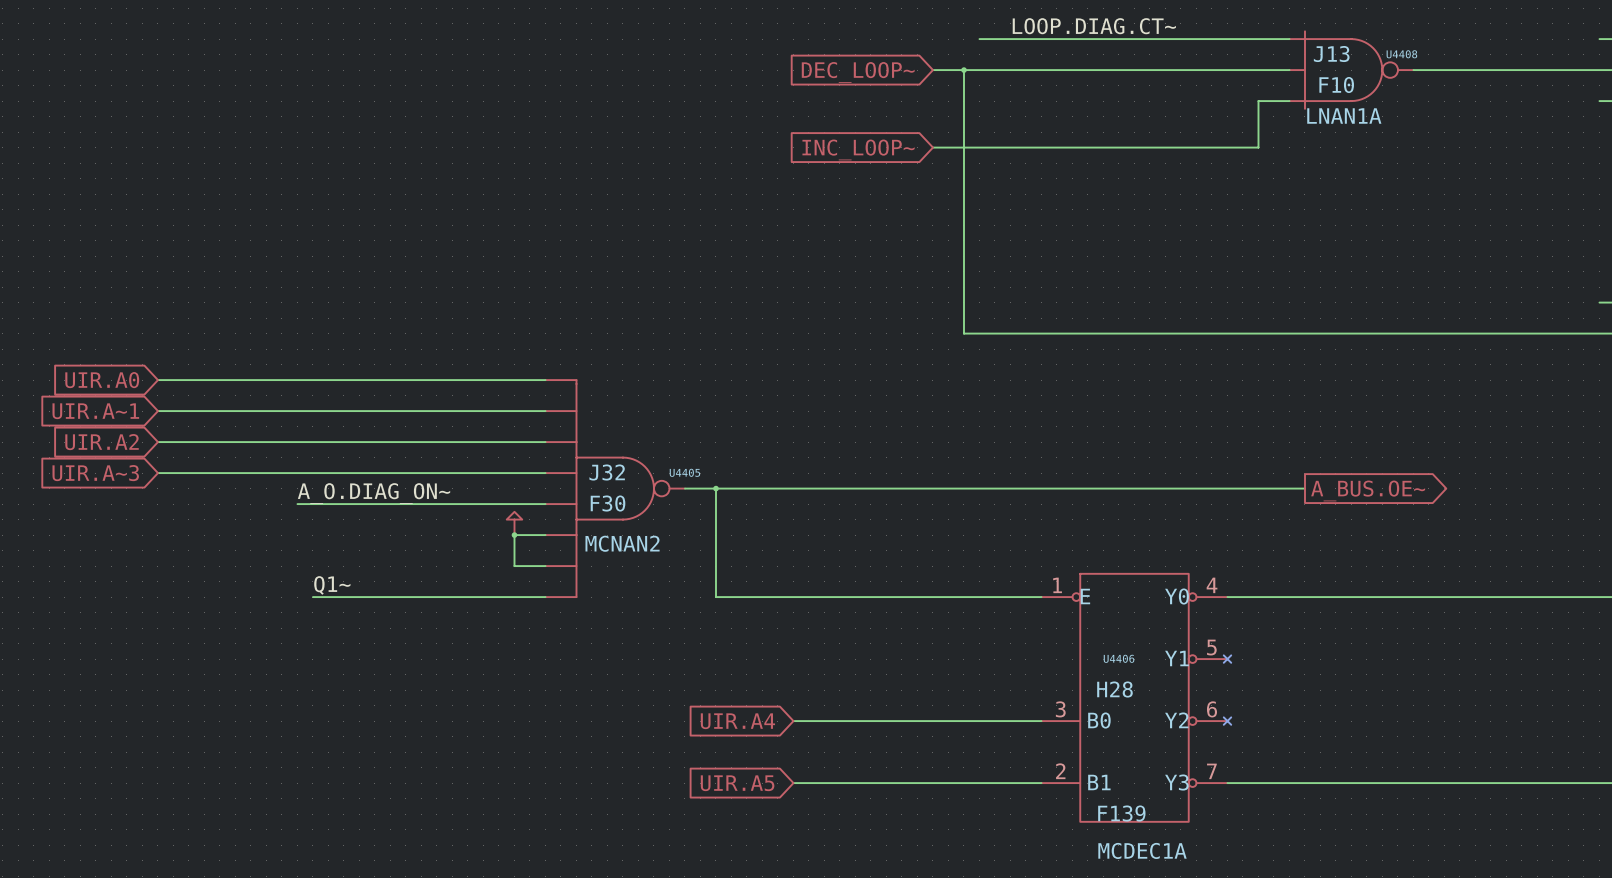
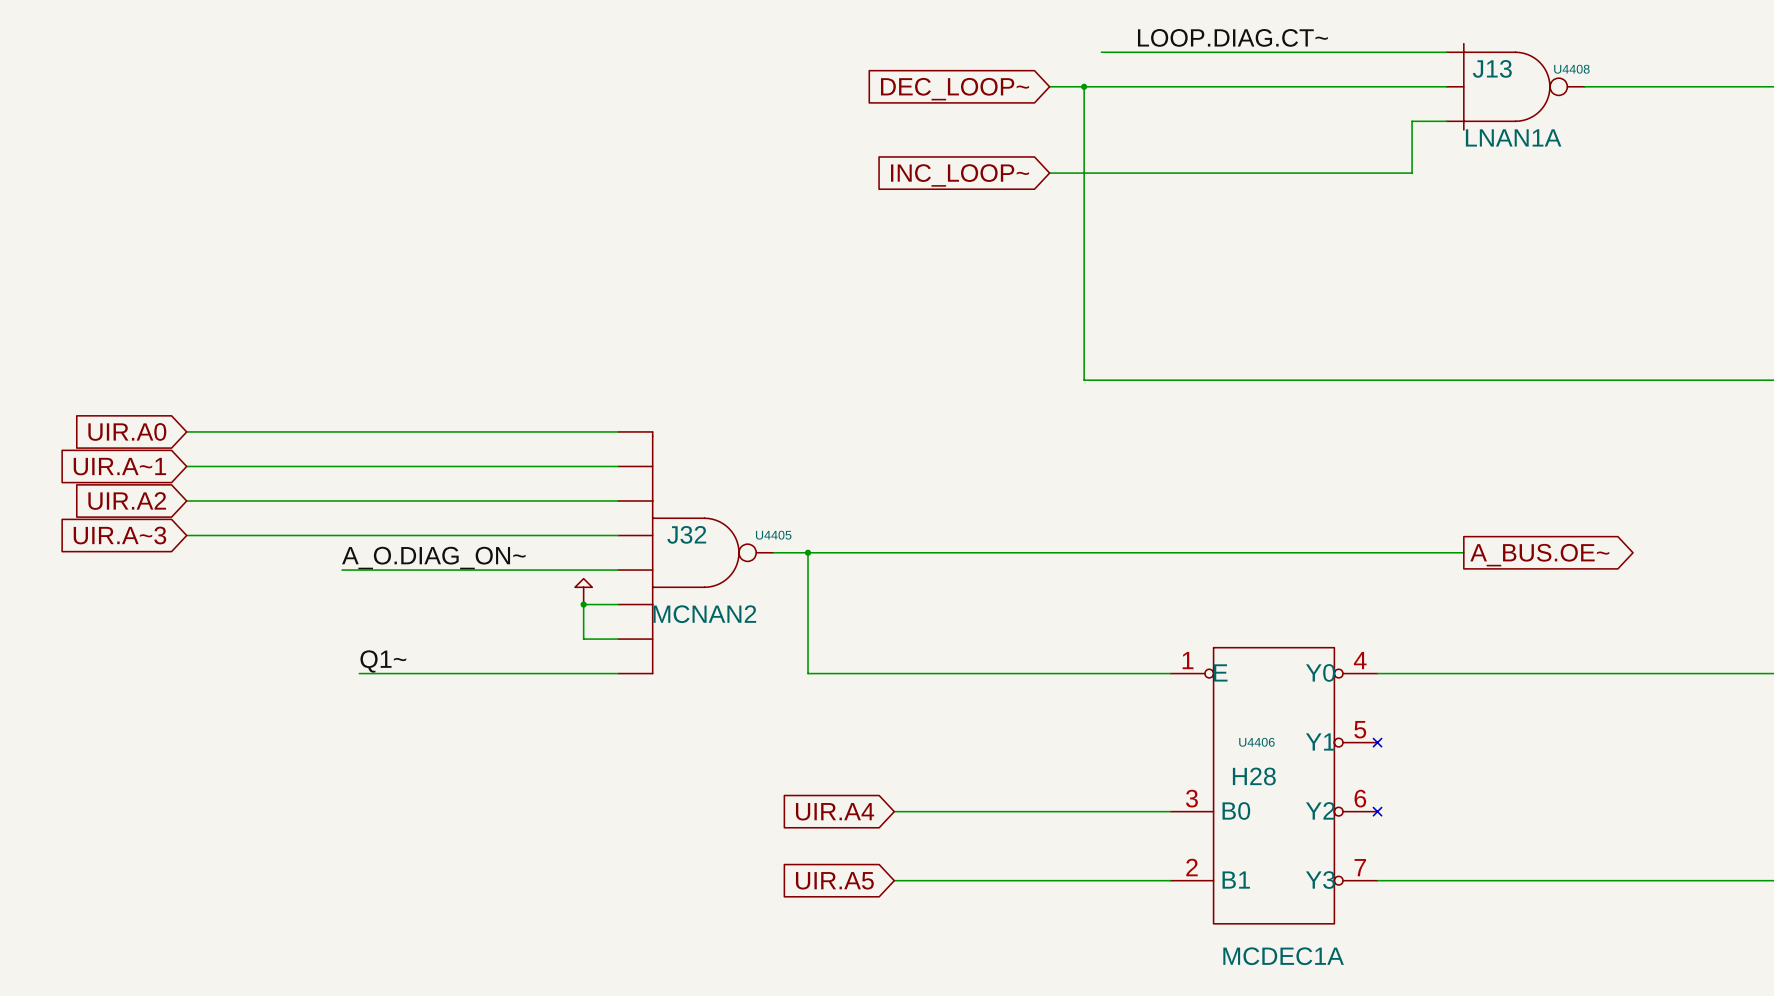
U4408 value: F10 (1336, 85) -> none
U4405 value: F30 (608, 503) -> none
U4406 value: F139 (1121, 813) -> none

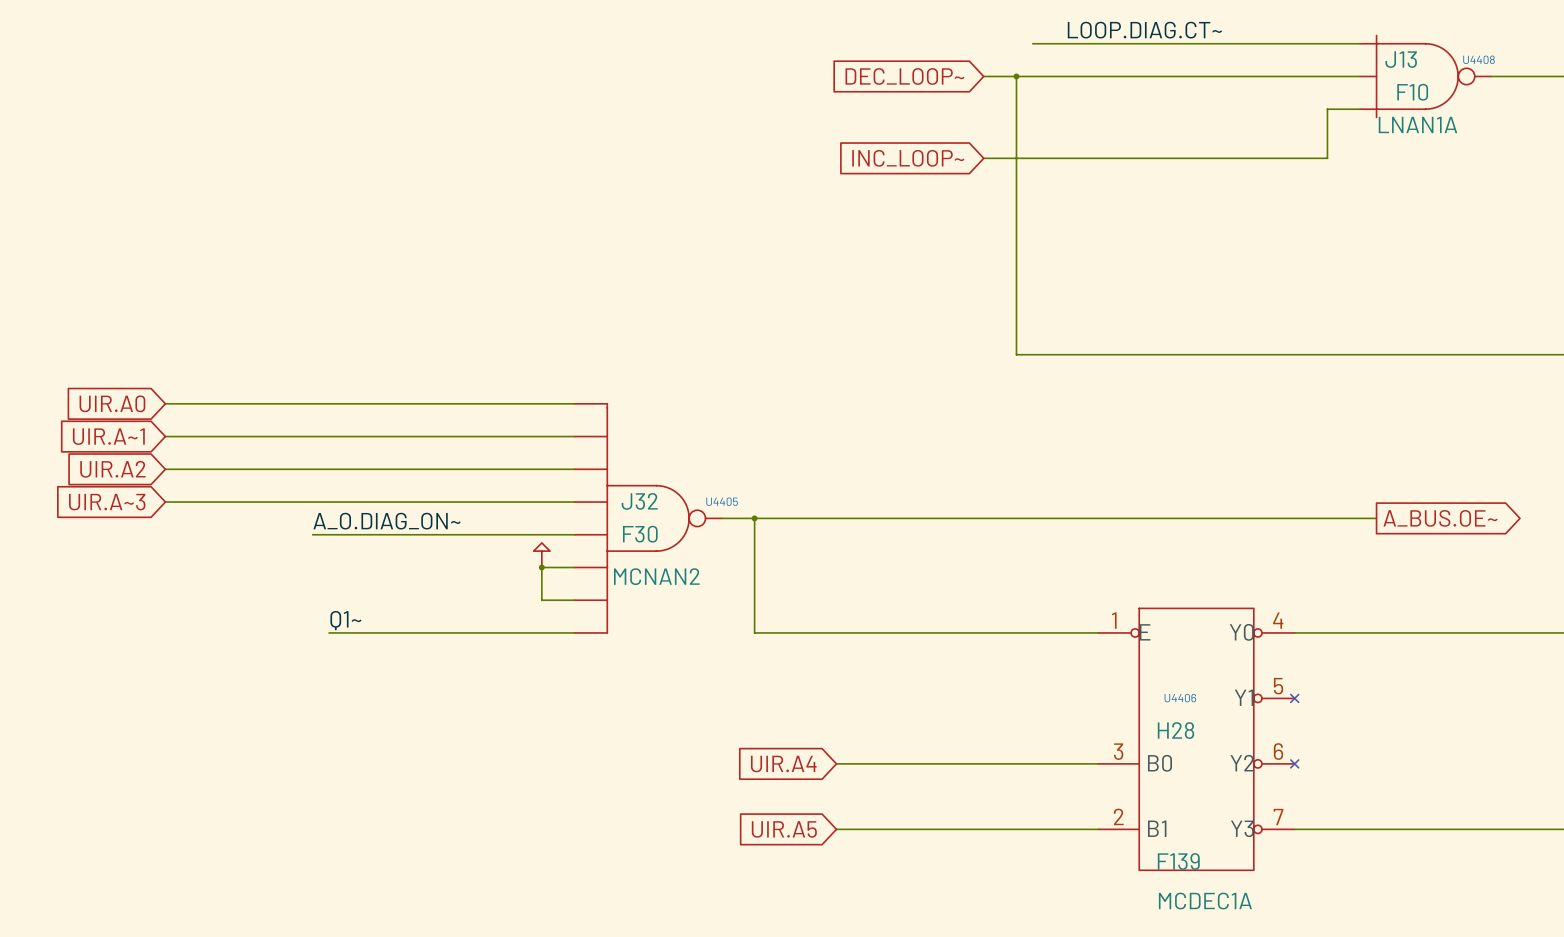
U4408 value: none -> F10 (1412, 92)
U4405 value: none -> F30 (640, 534)
U4406 value: none -> F139 (1178, 861)

